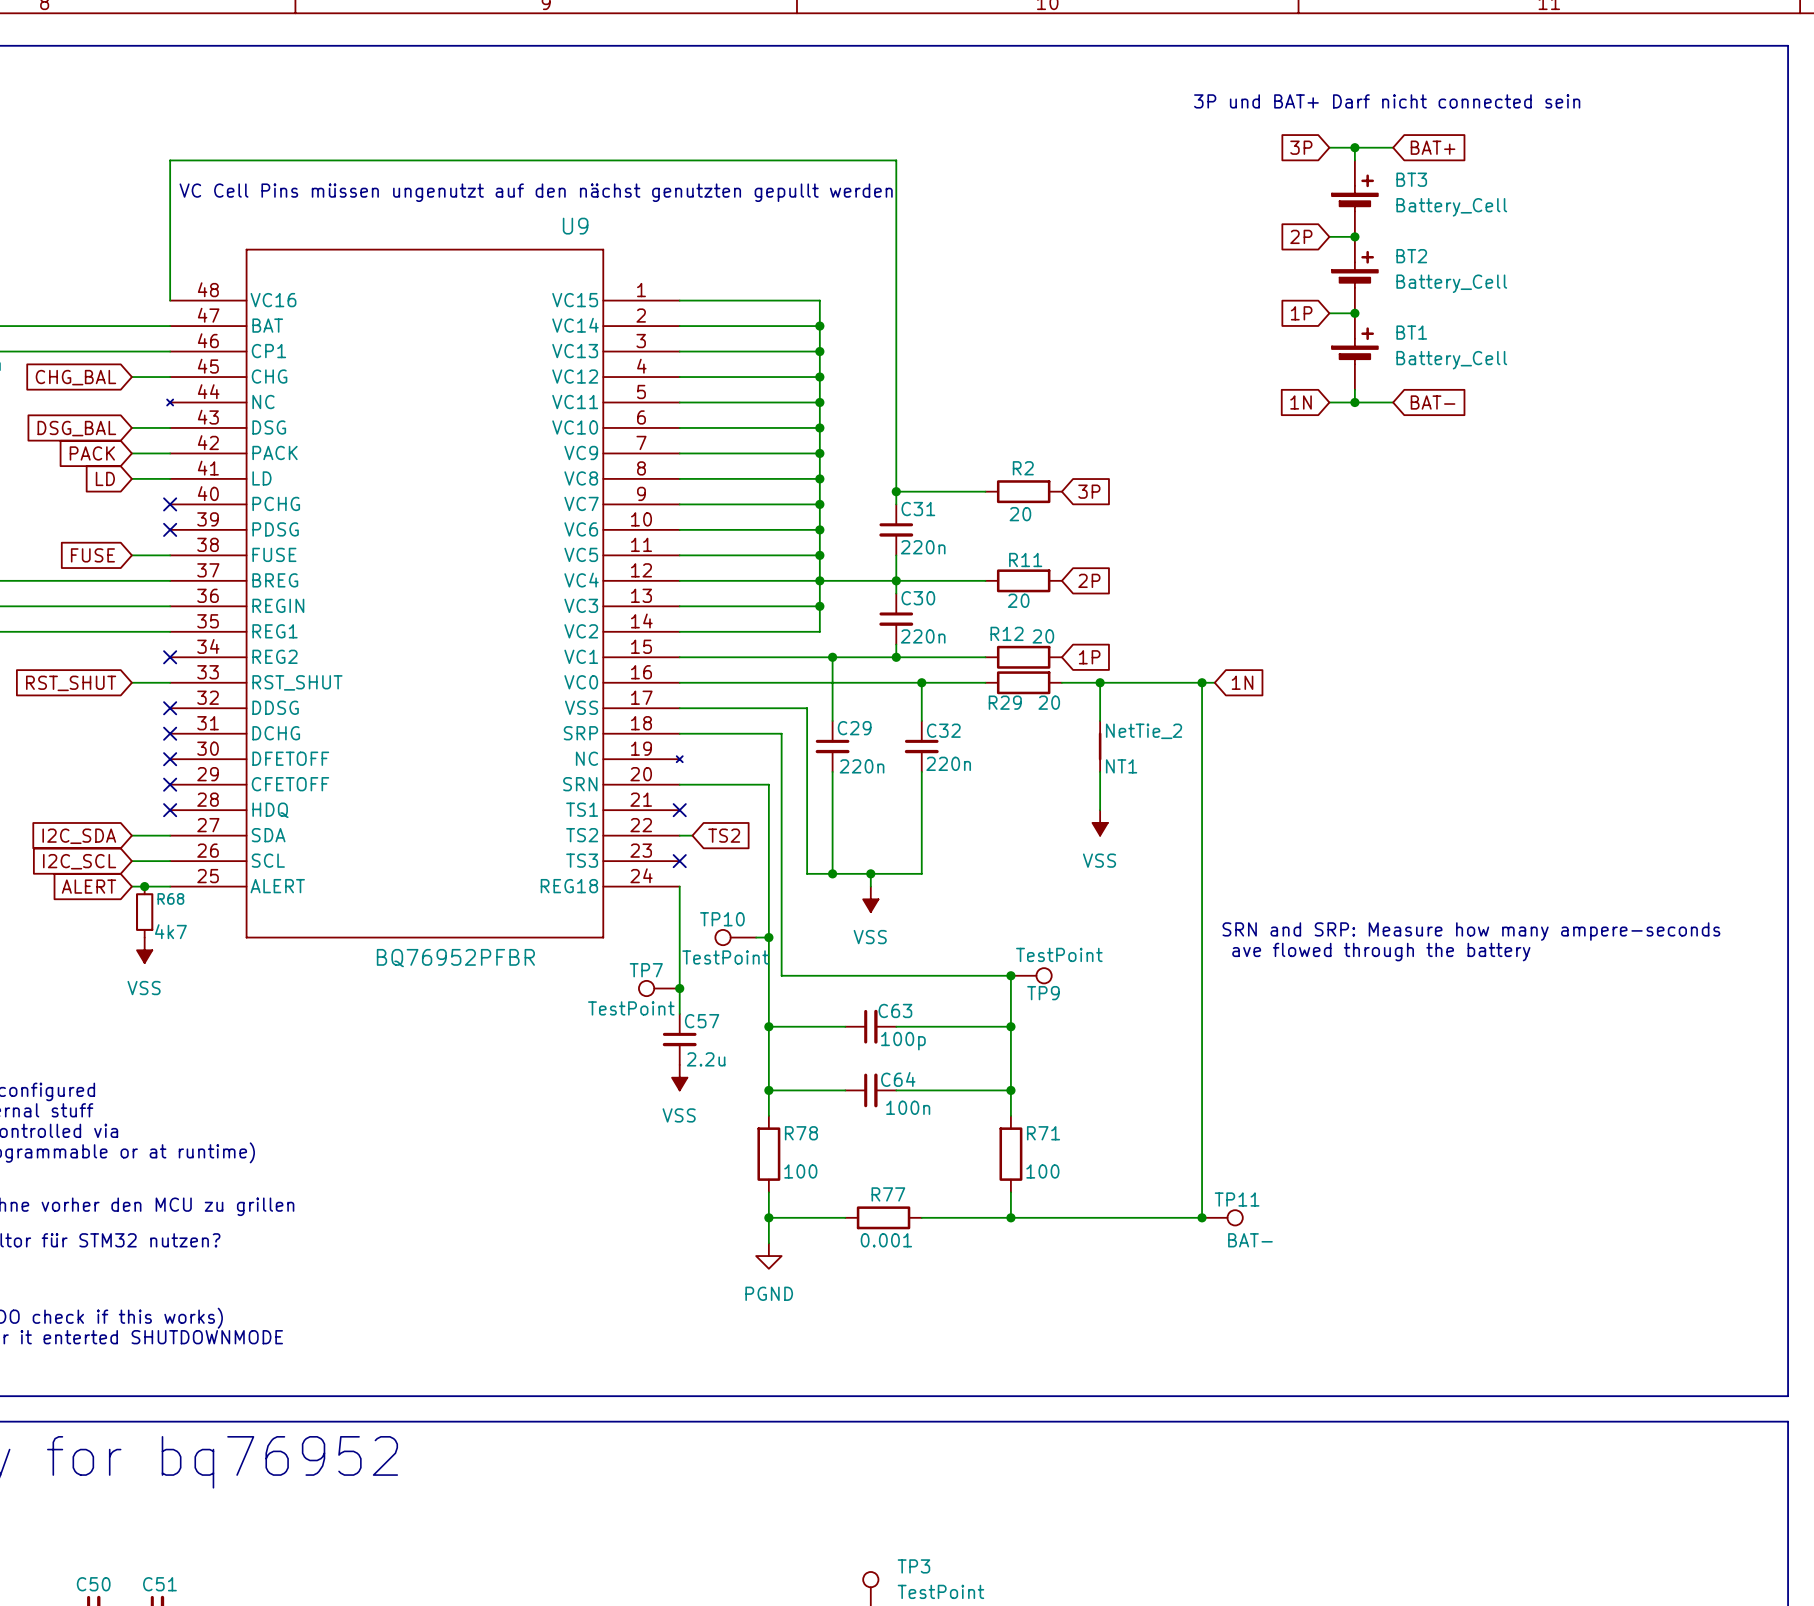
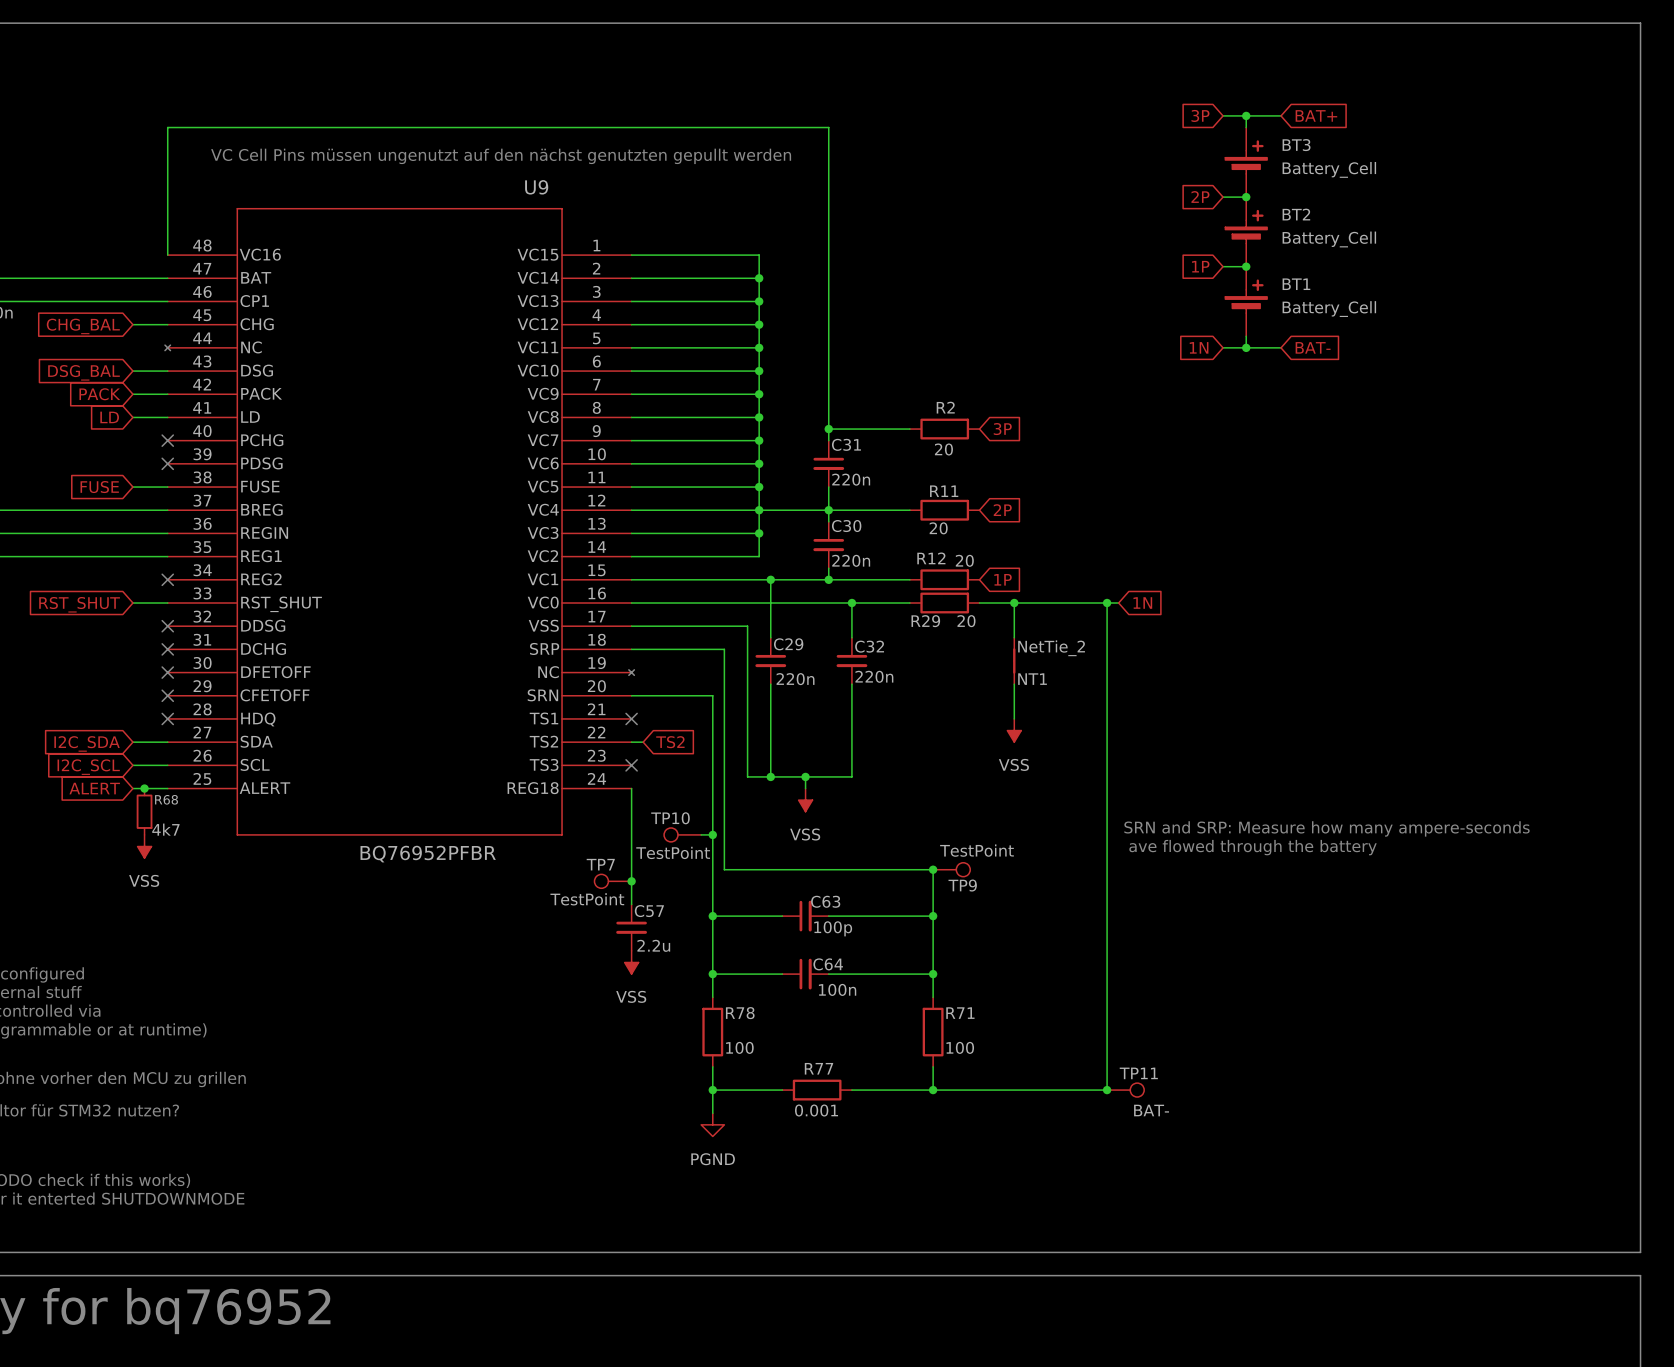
text: 3P und BAT+ Darf nicht connected sein (1387, 101) -> none

